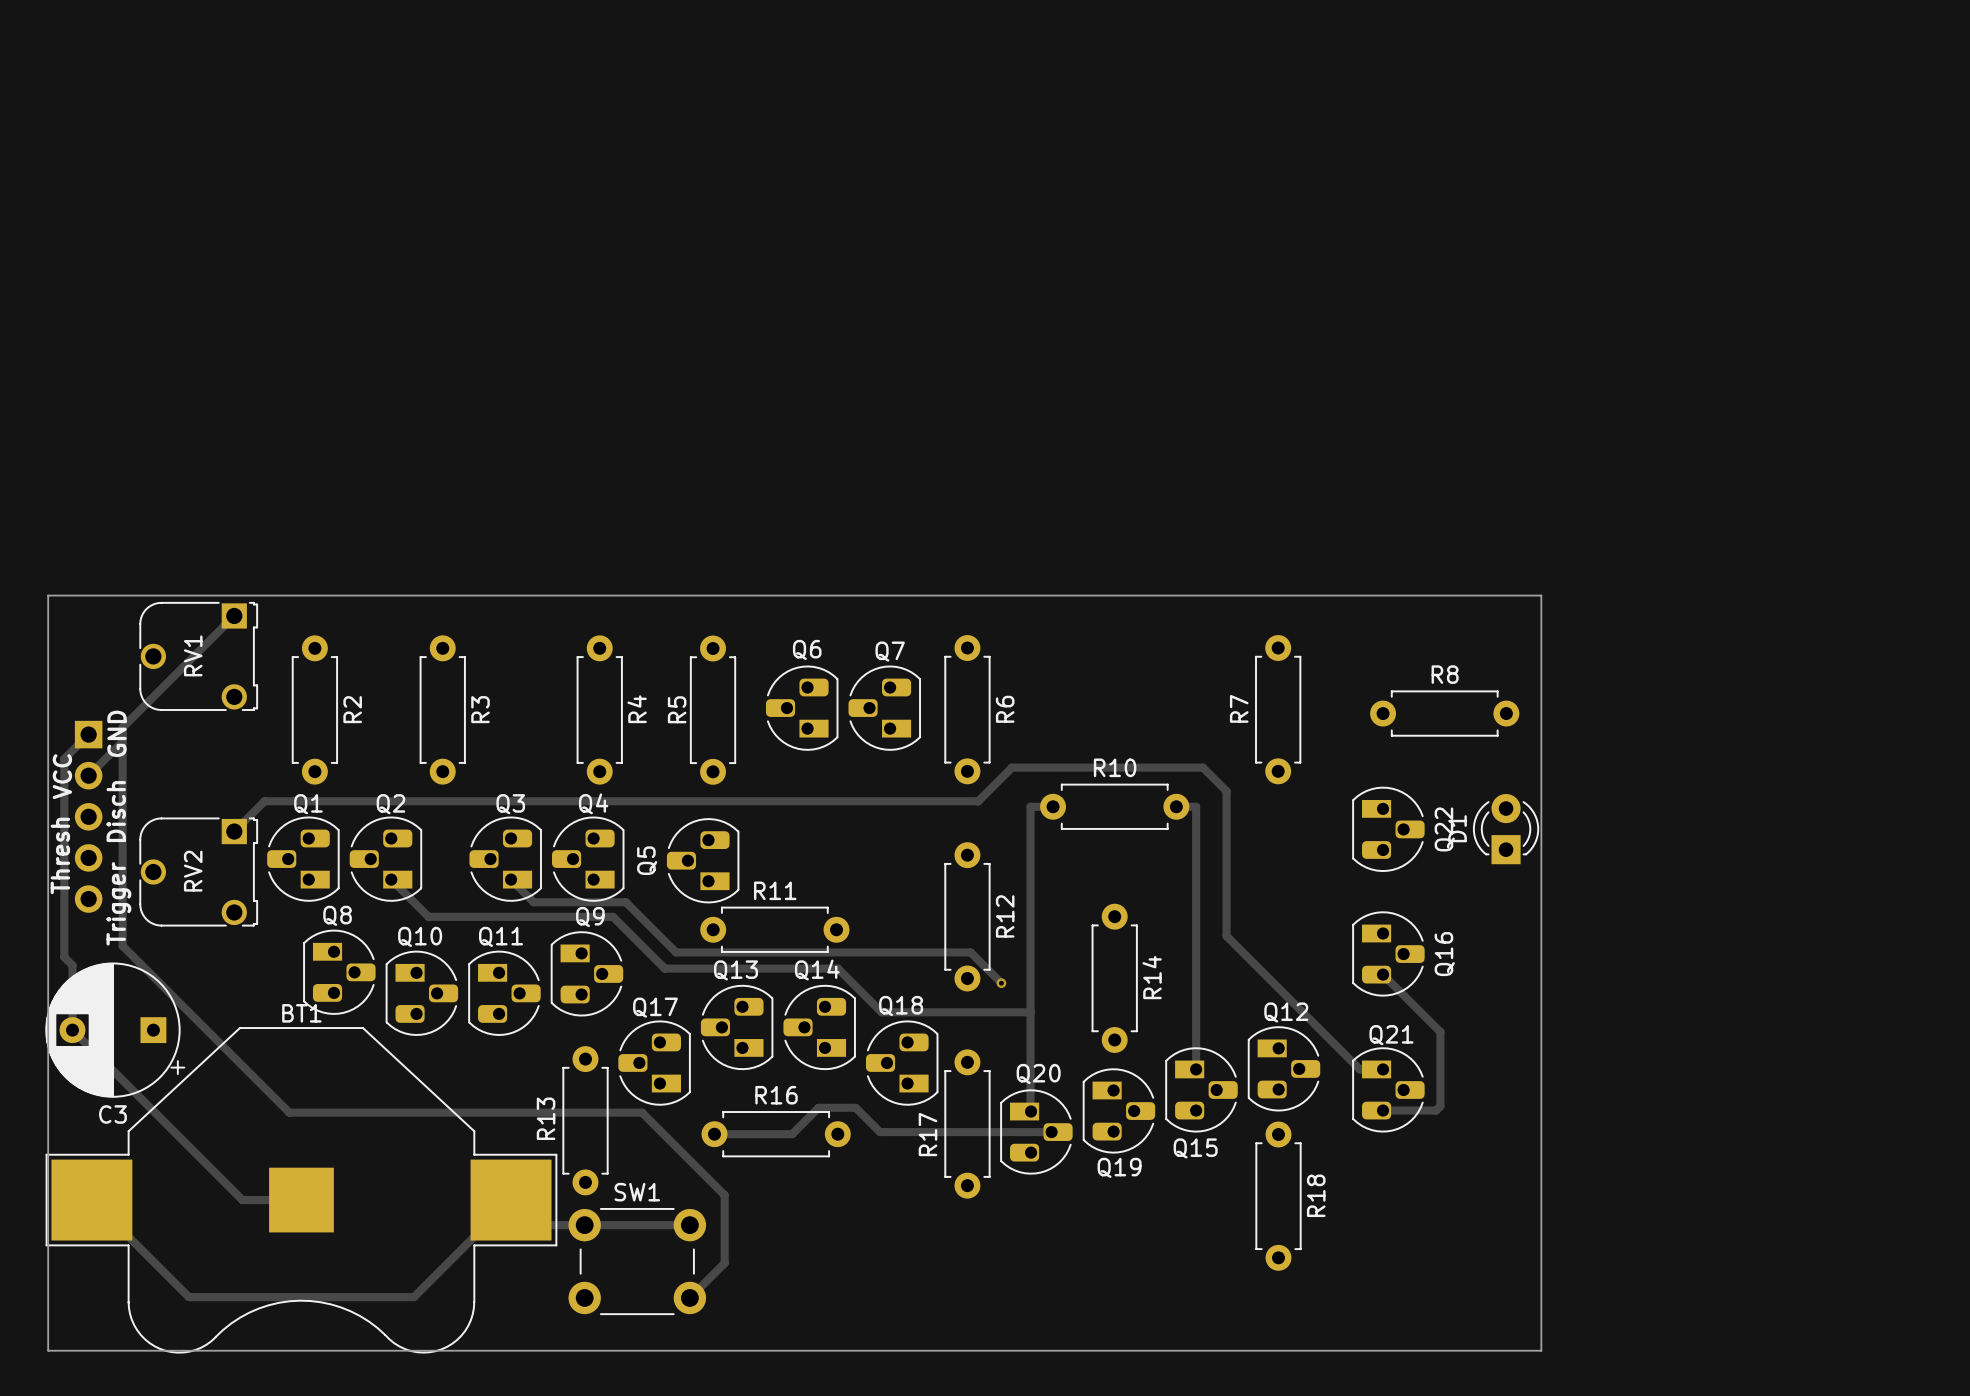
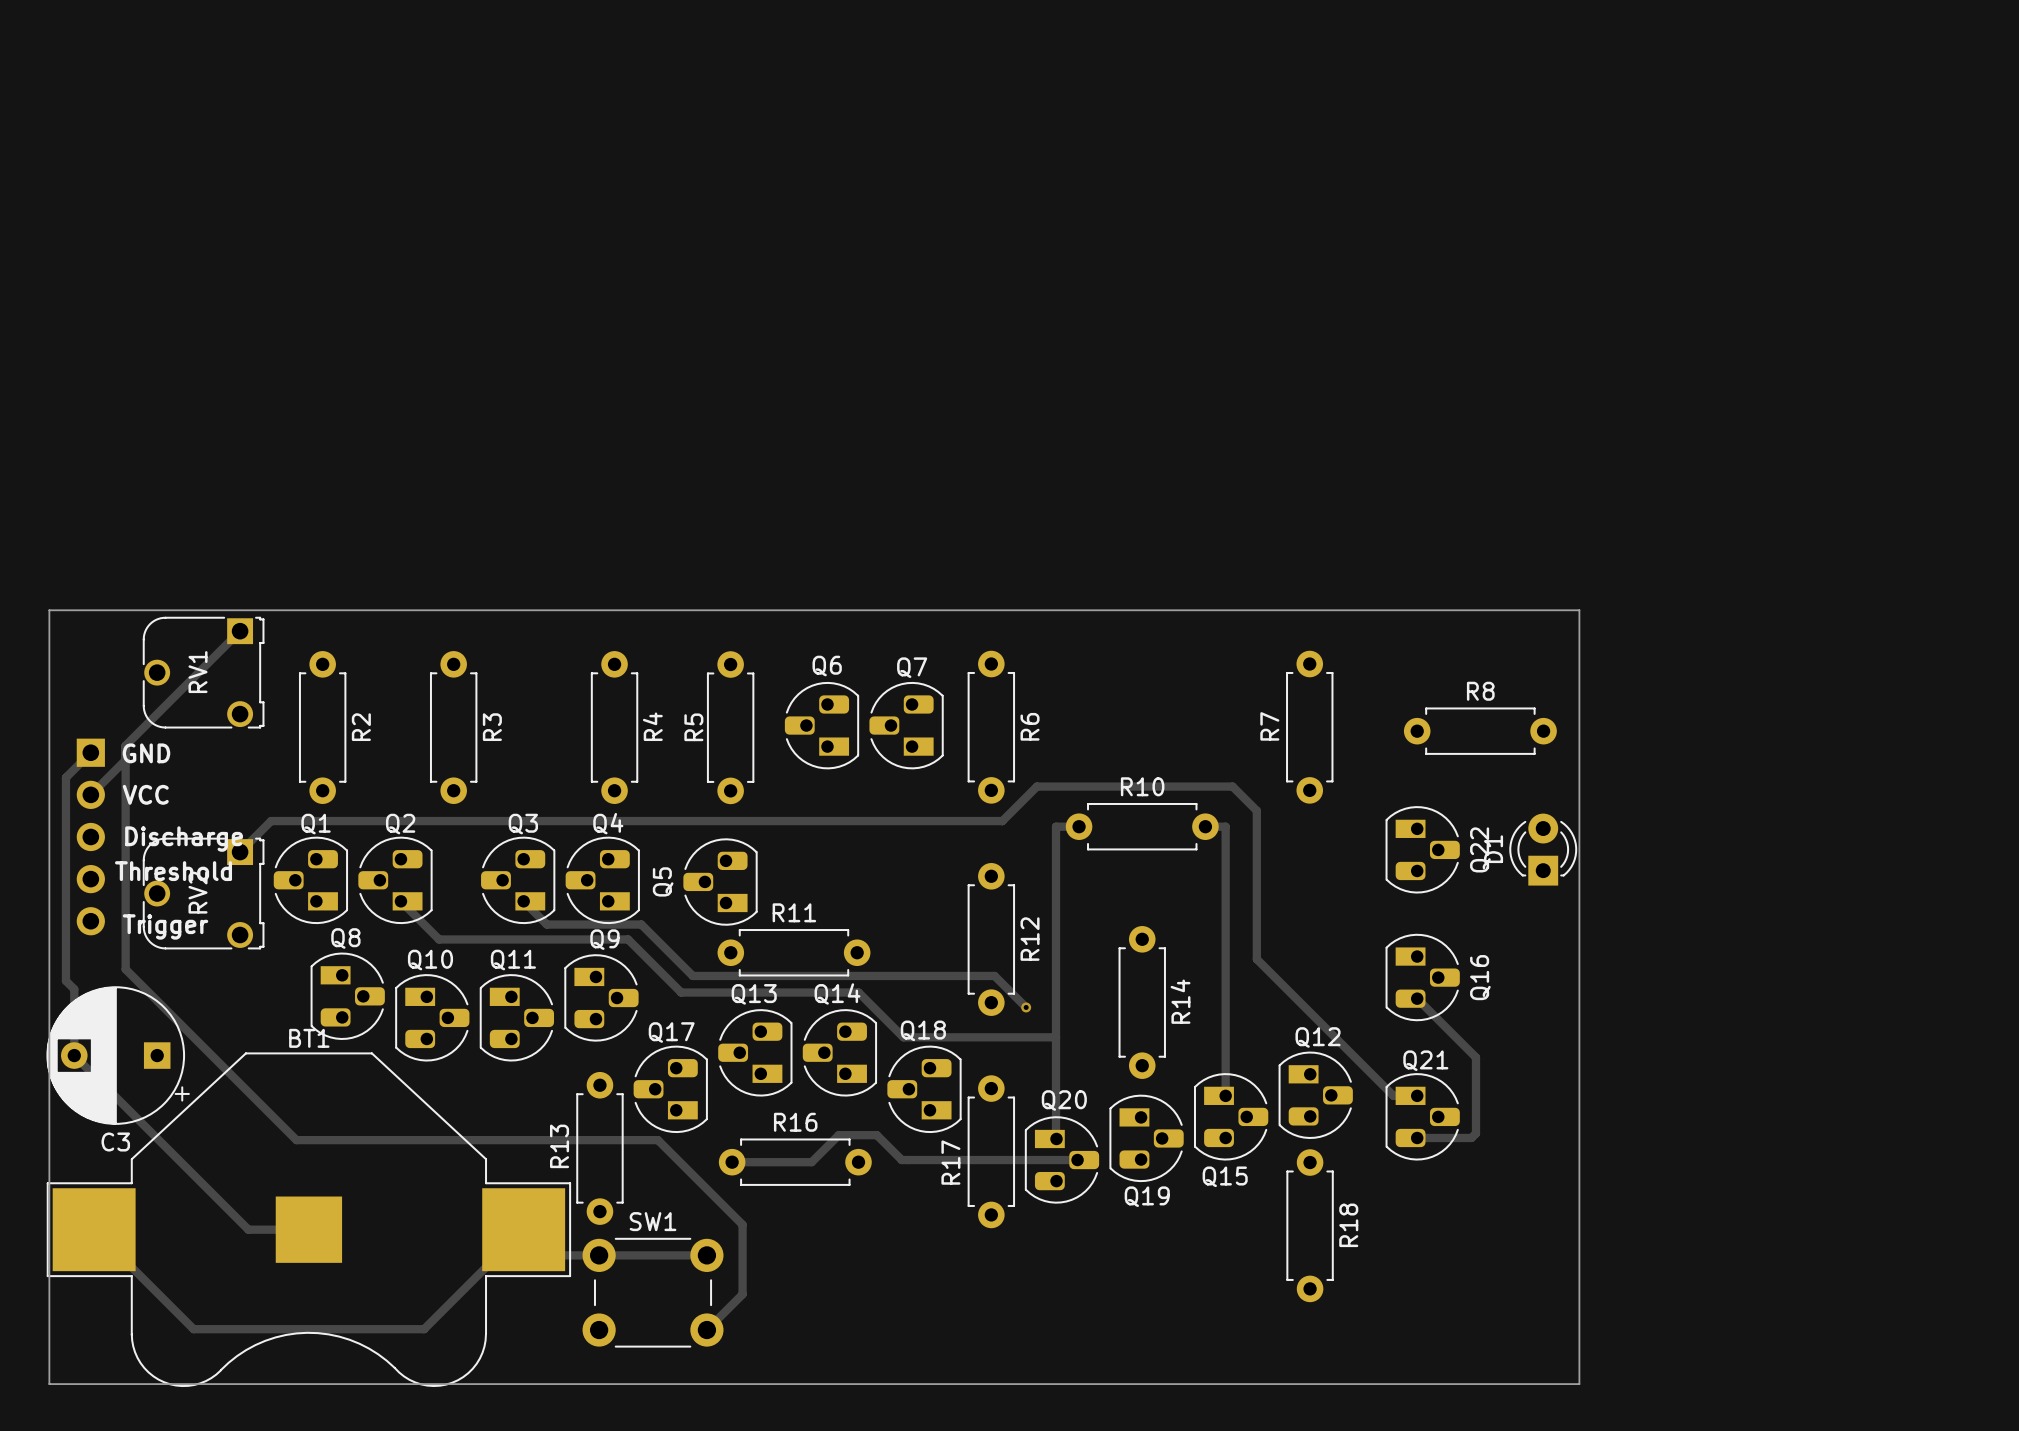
text rotation: 0° (117, 733) -> 90° clockwise (146, 753)
text rotation: 0° (62, 776) -> 90° clockwise (145, 794)
text position: VCC (62, 776) -> VCC (145, 794)
text: Disch (116, 811) -> Discharge (184, 839)
text: none -> Threshold (173, 871)
text: Thresh (60, 855) -> none
text rotation: 0° (118, 903) -> 90° clockwise (165, 926)

